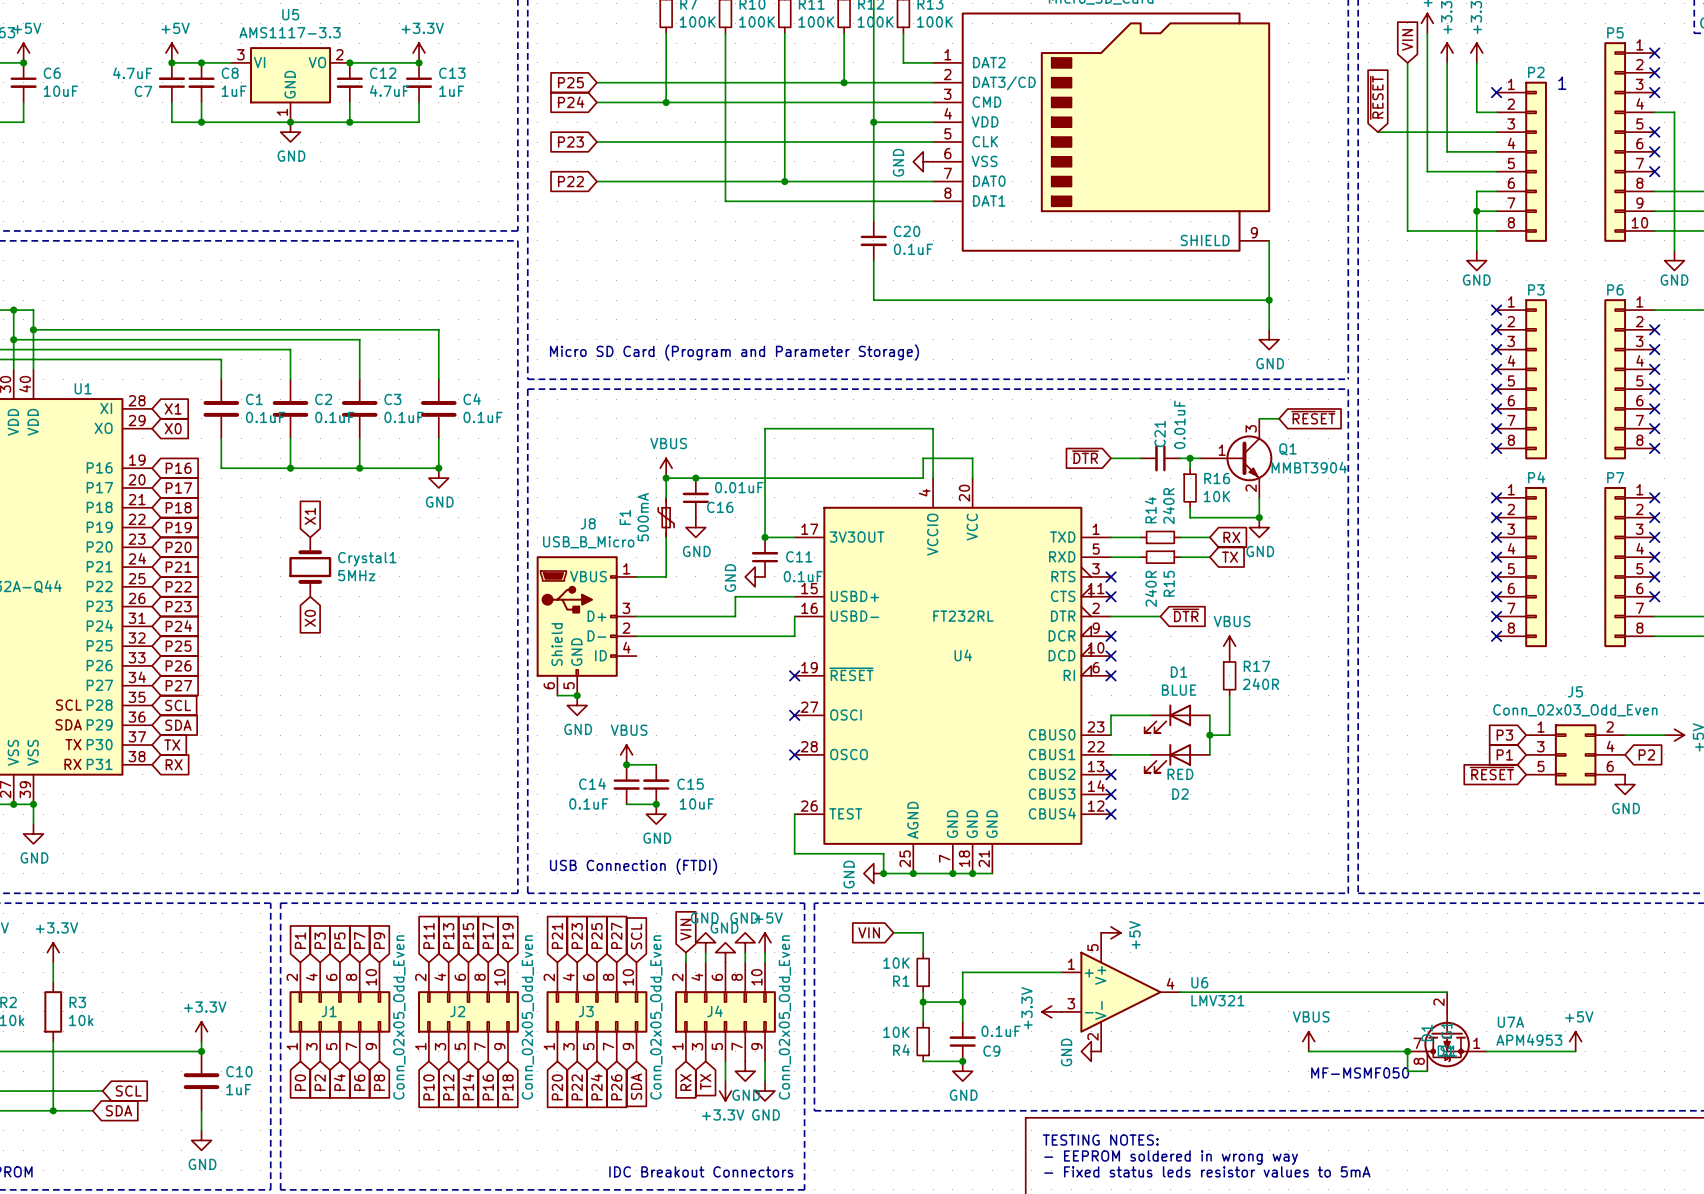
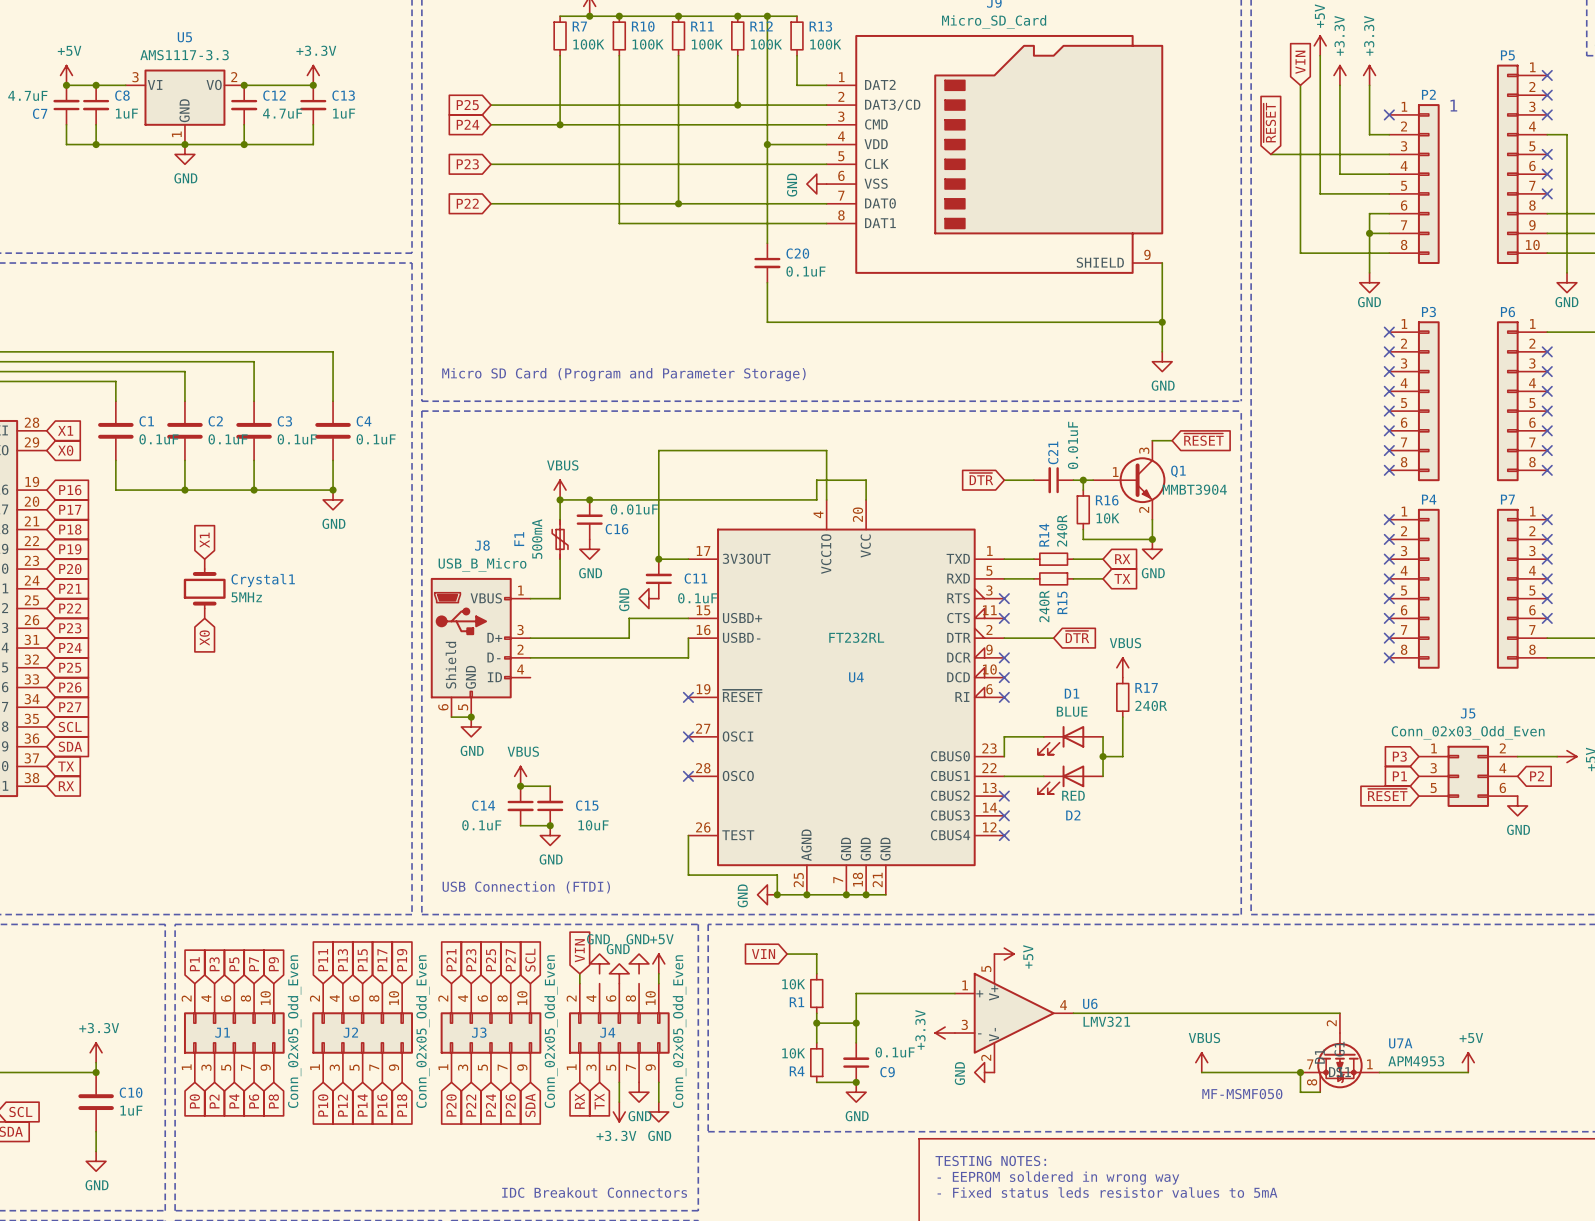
wire: (705, 952) (705, 962) -> none
wire: (745, 952) (745, 962) -> none

